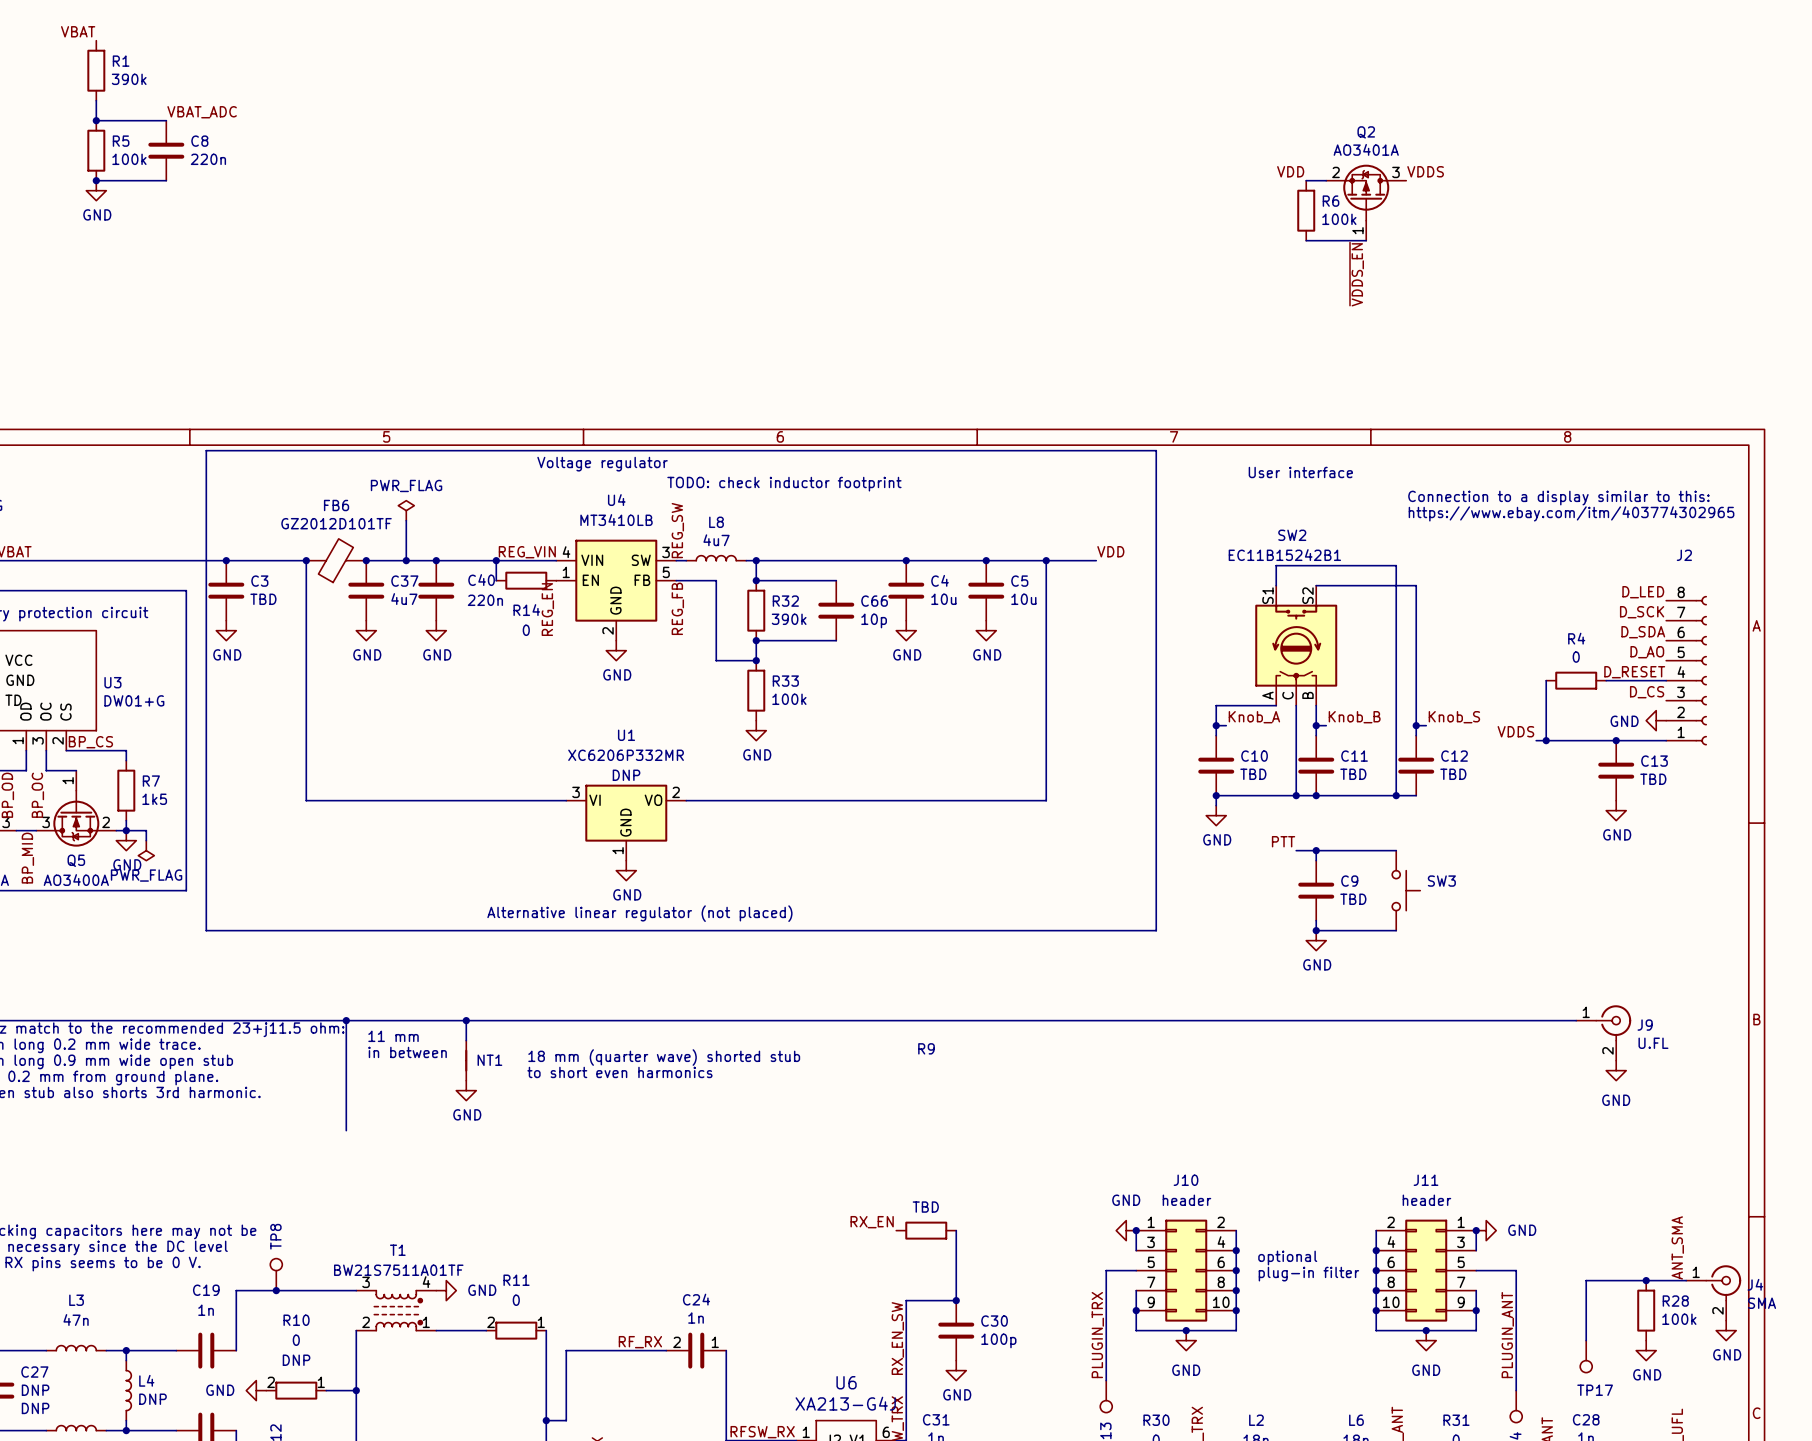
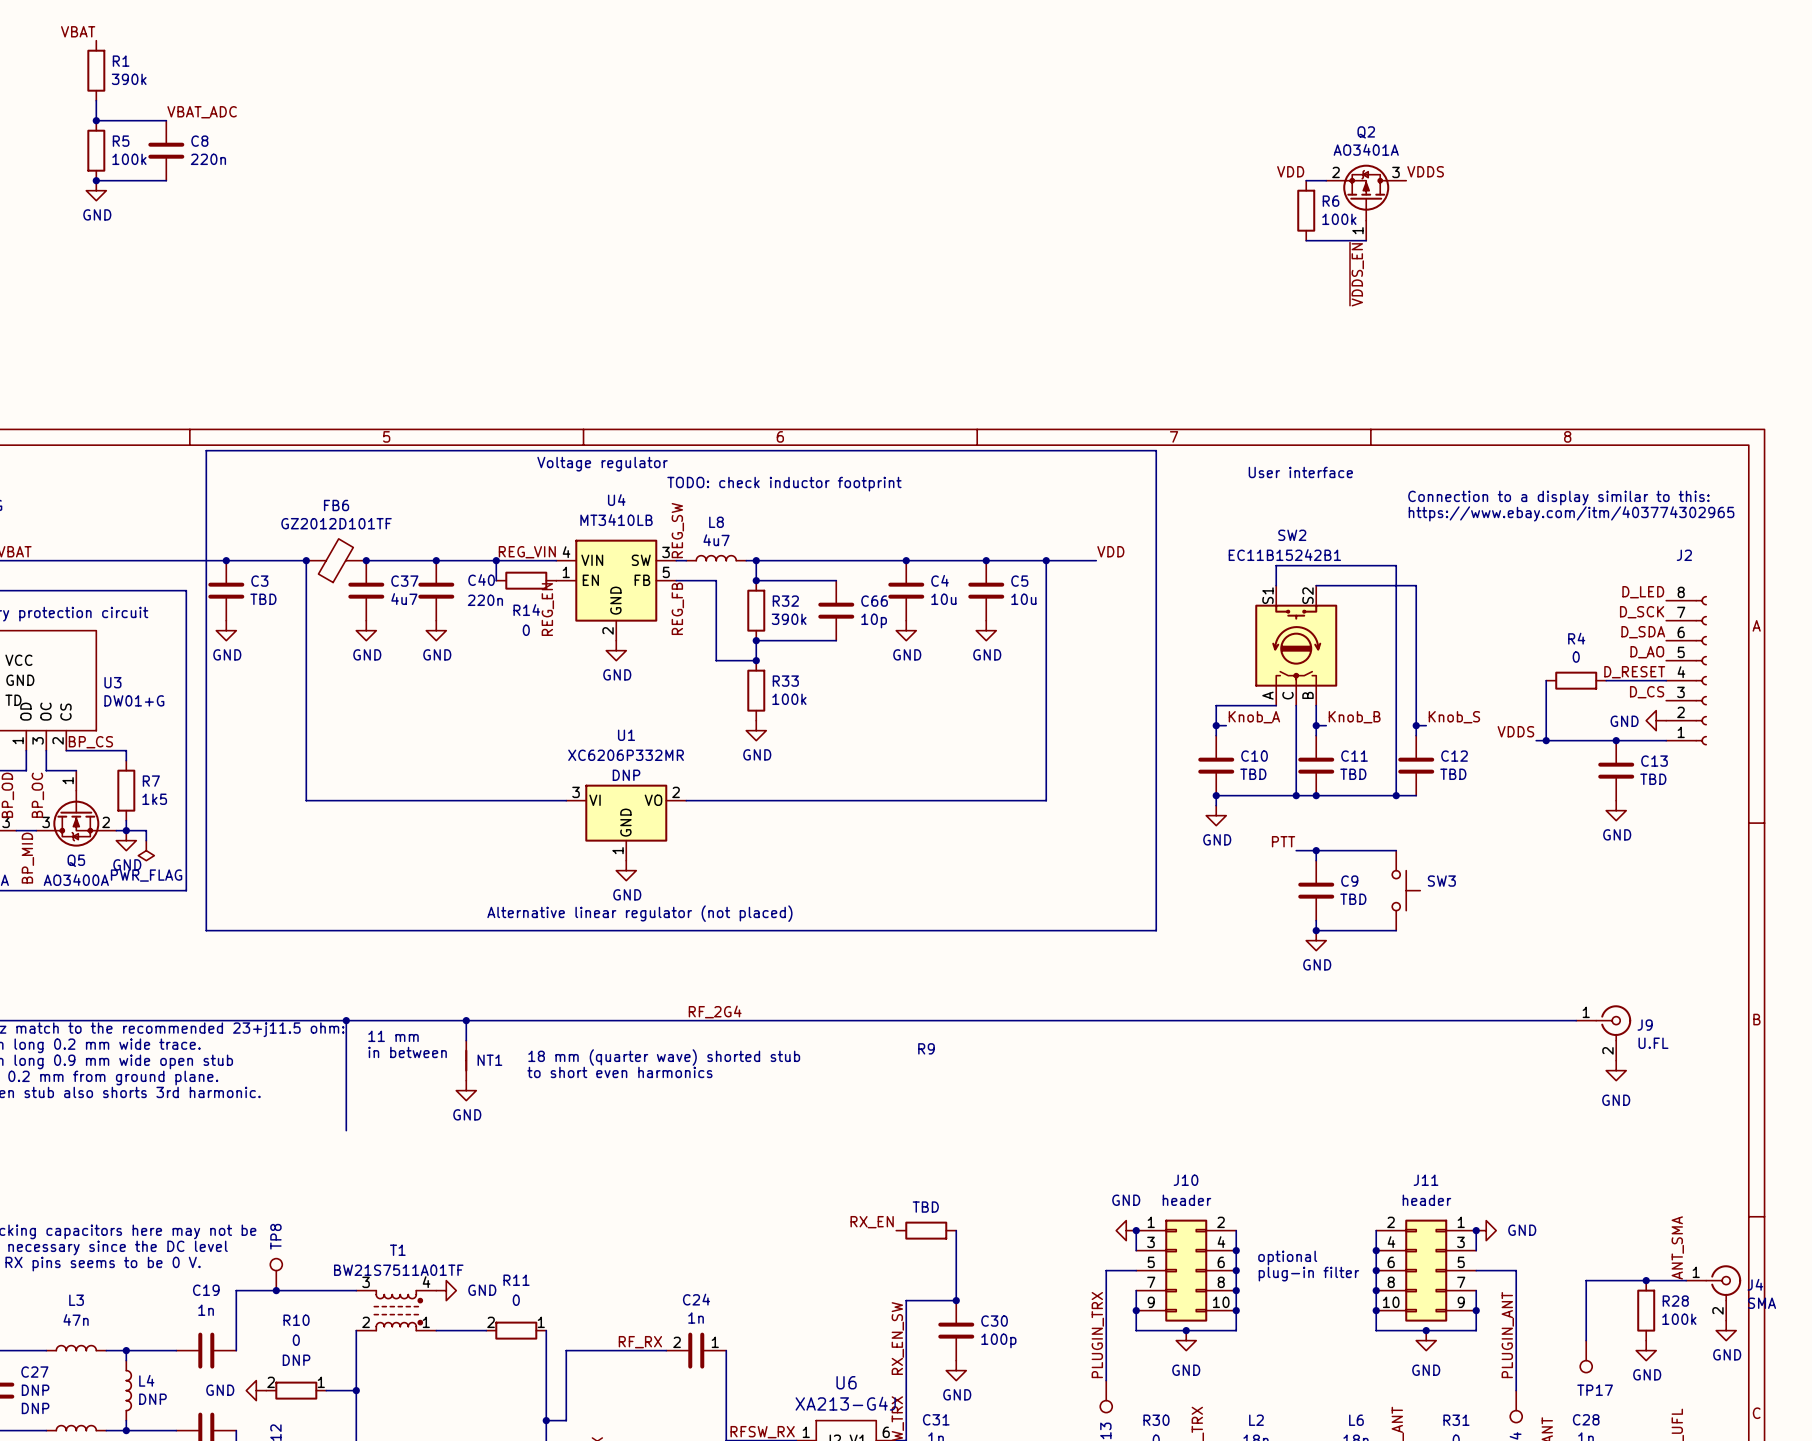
power symbol: PWR_FLAG (406, 510) -> none
wire: (406, 520) (406, 560) -> none
junction: (406, 560) -> none
label: none -> RF_2G4 (715, 1011)

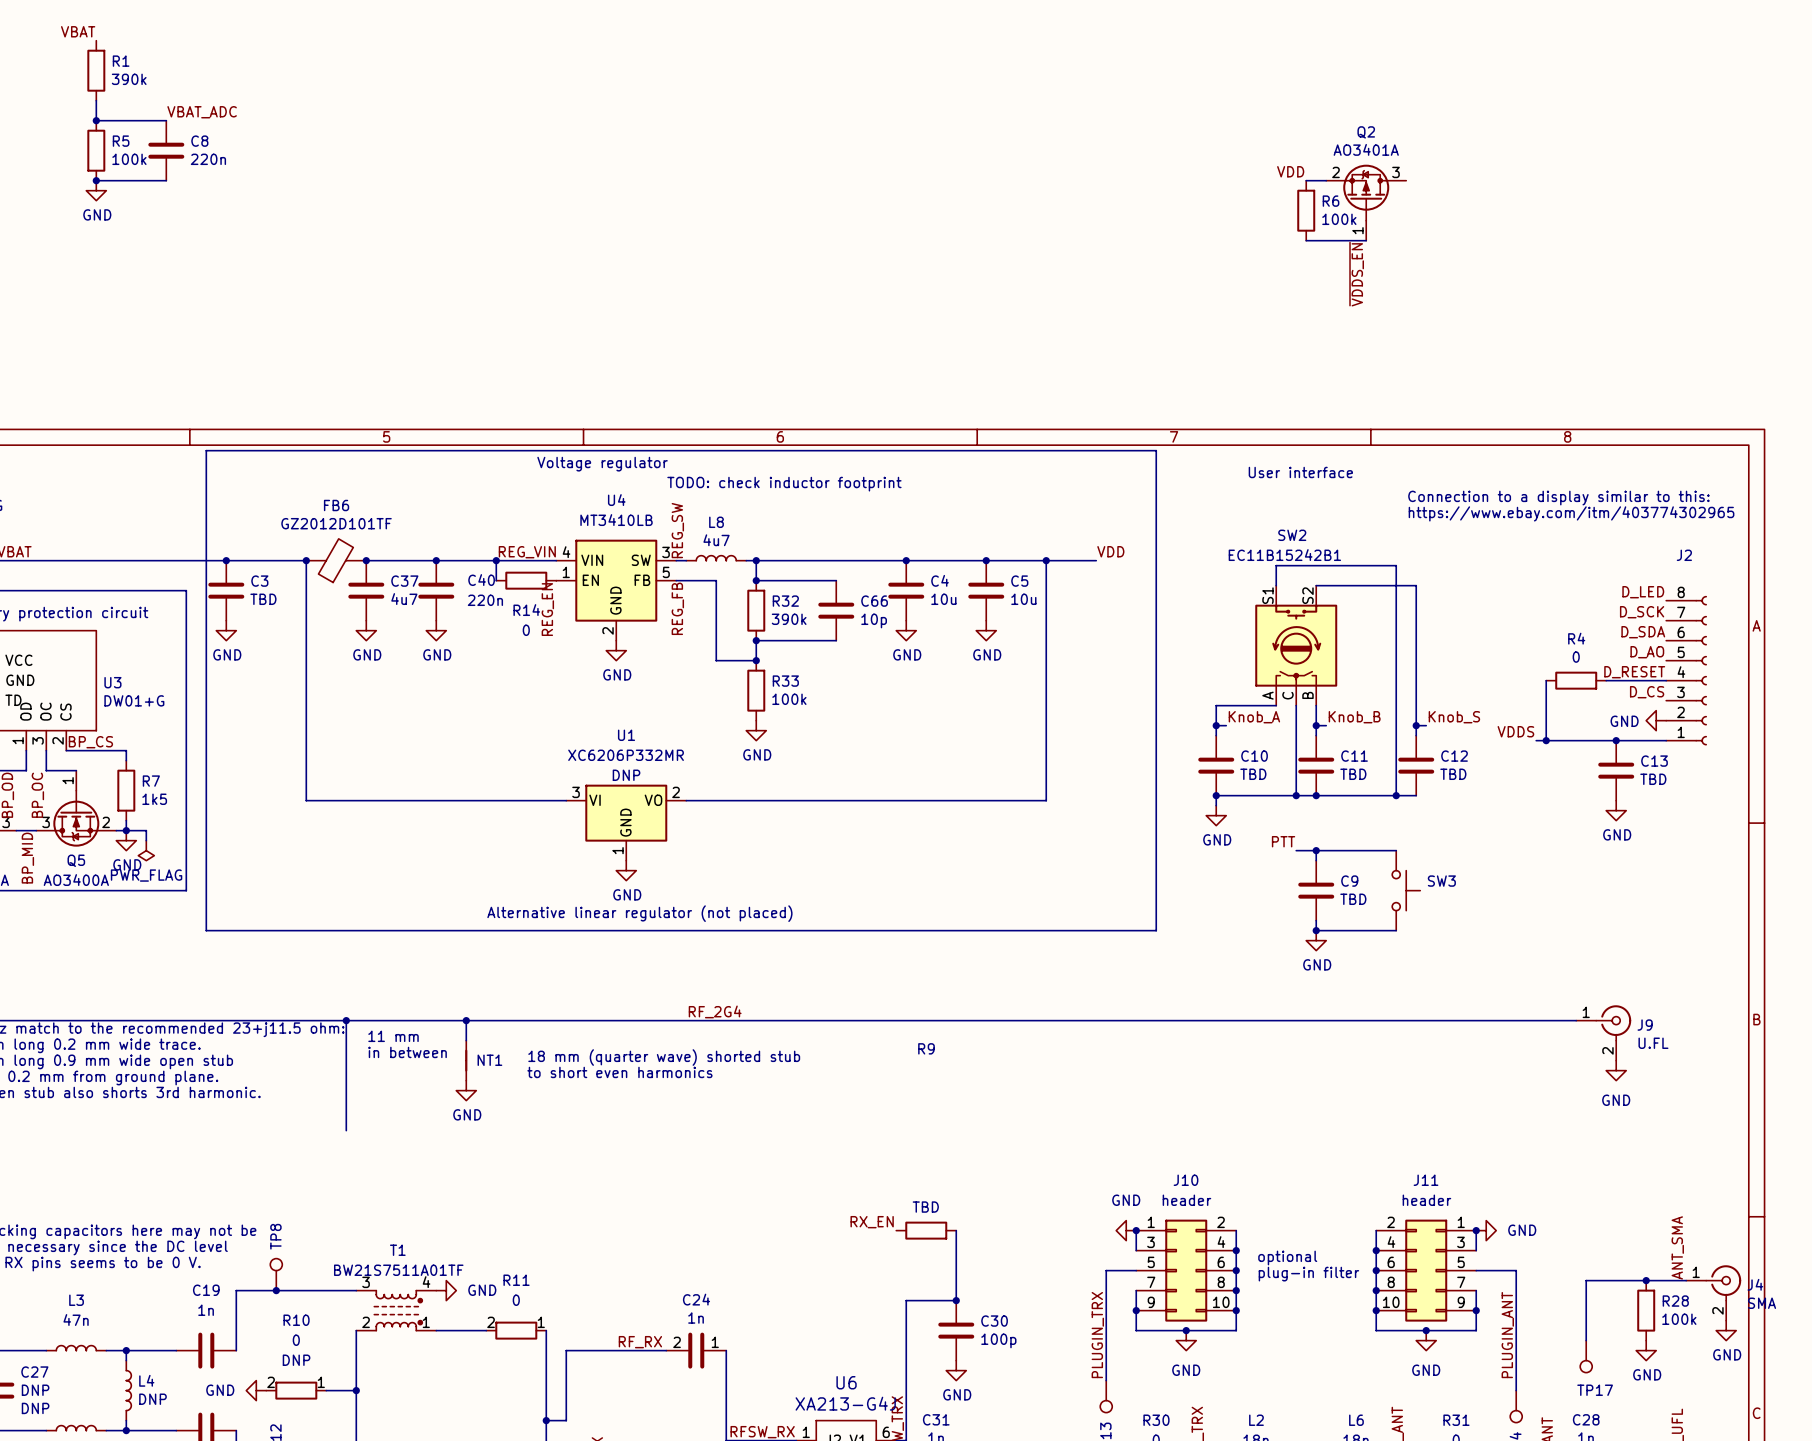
label: VDDS (1425, 171) -> none
label: RX_EN_SW (897, 1338) -> none

